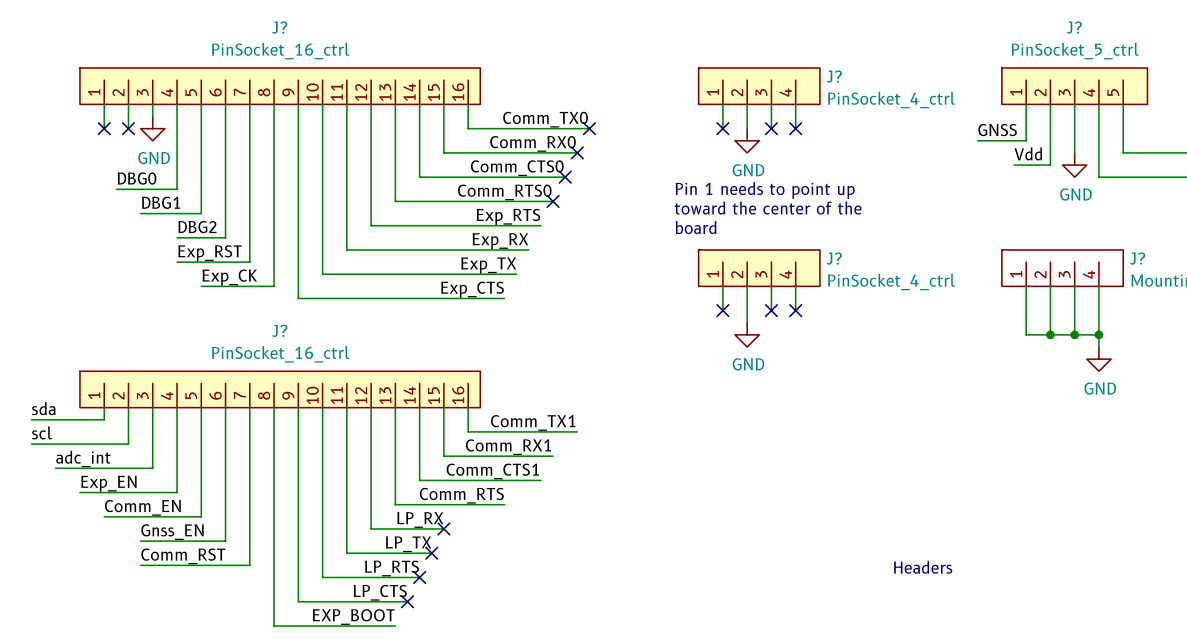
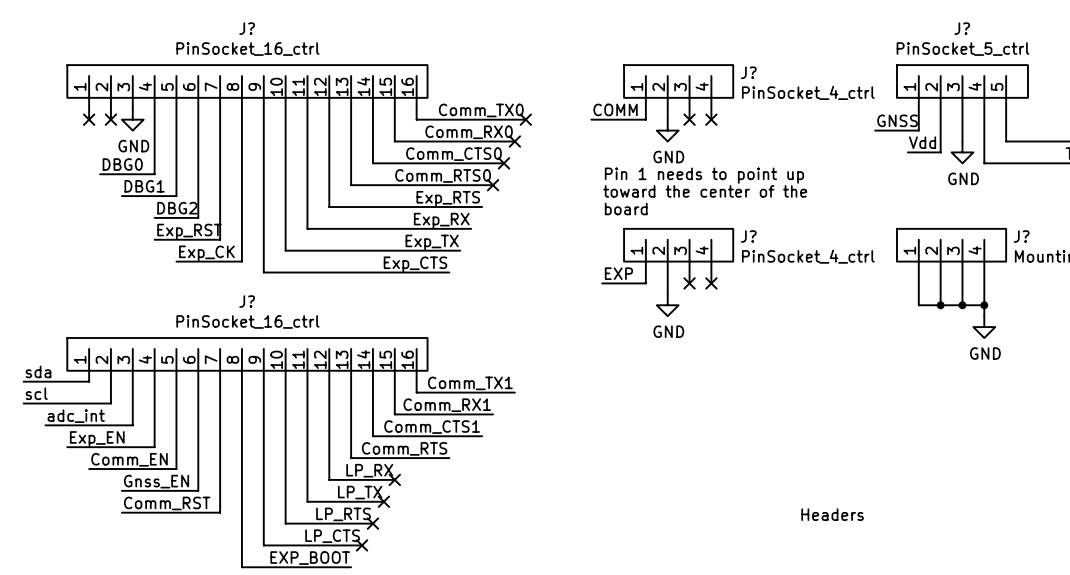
label: none -> COMM (615, 109)
wire: none -> (591, 119) (645, 119)
no-connect mark: (722, 128) -> none
label: none -> EXP (618, 273)
wire: none -> (602, 283) (645, 283)
no-connect mark: (722, 310) -> none

